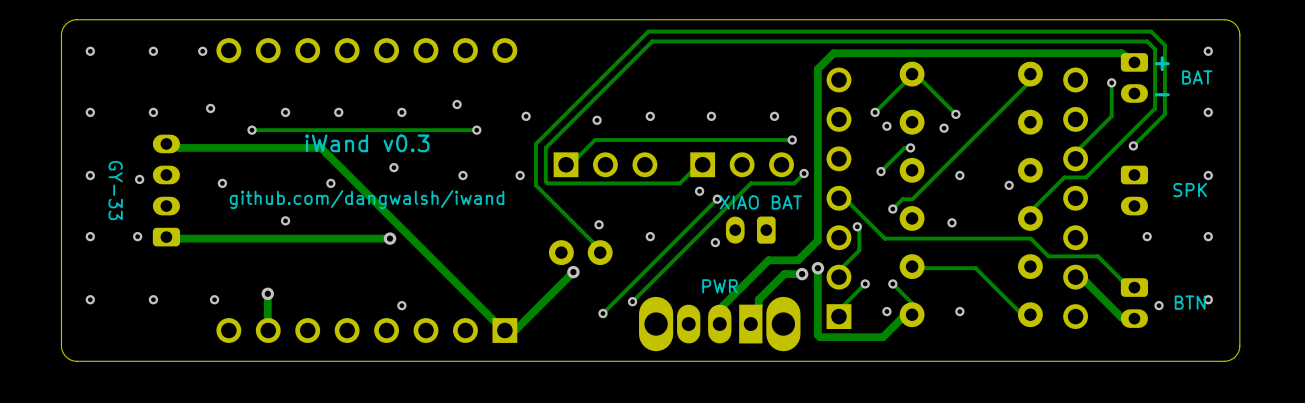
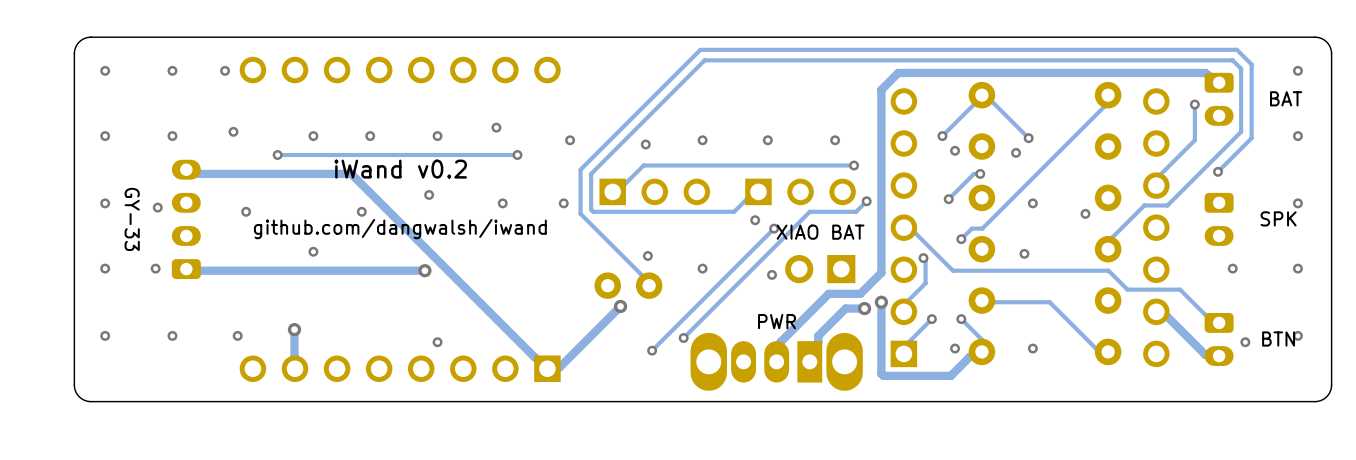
text: + (1162, 63) -> none
text: - (1162, 94) -> none
text: iWand v0.3 (367, 143) -> iWand v0.2 (400, 169)
part footprint: [725, 216, 776, 244] -> [785, 255, 856, 284]

